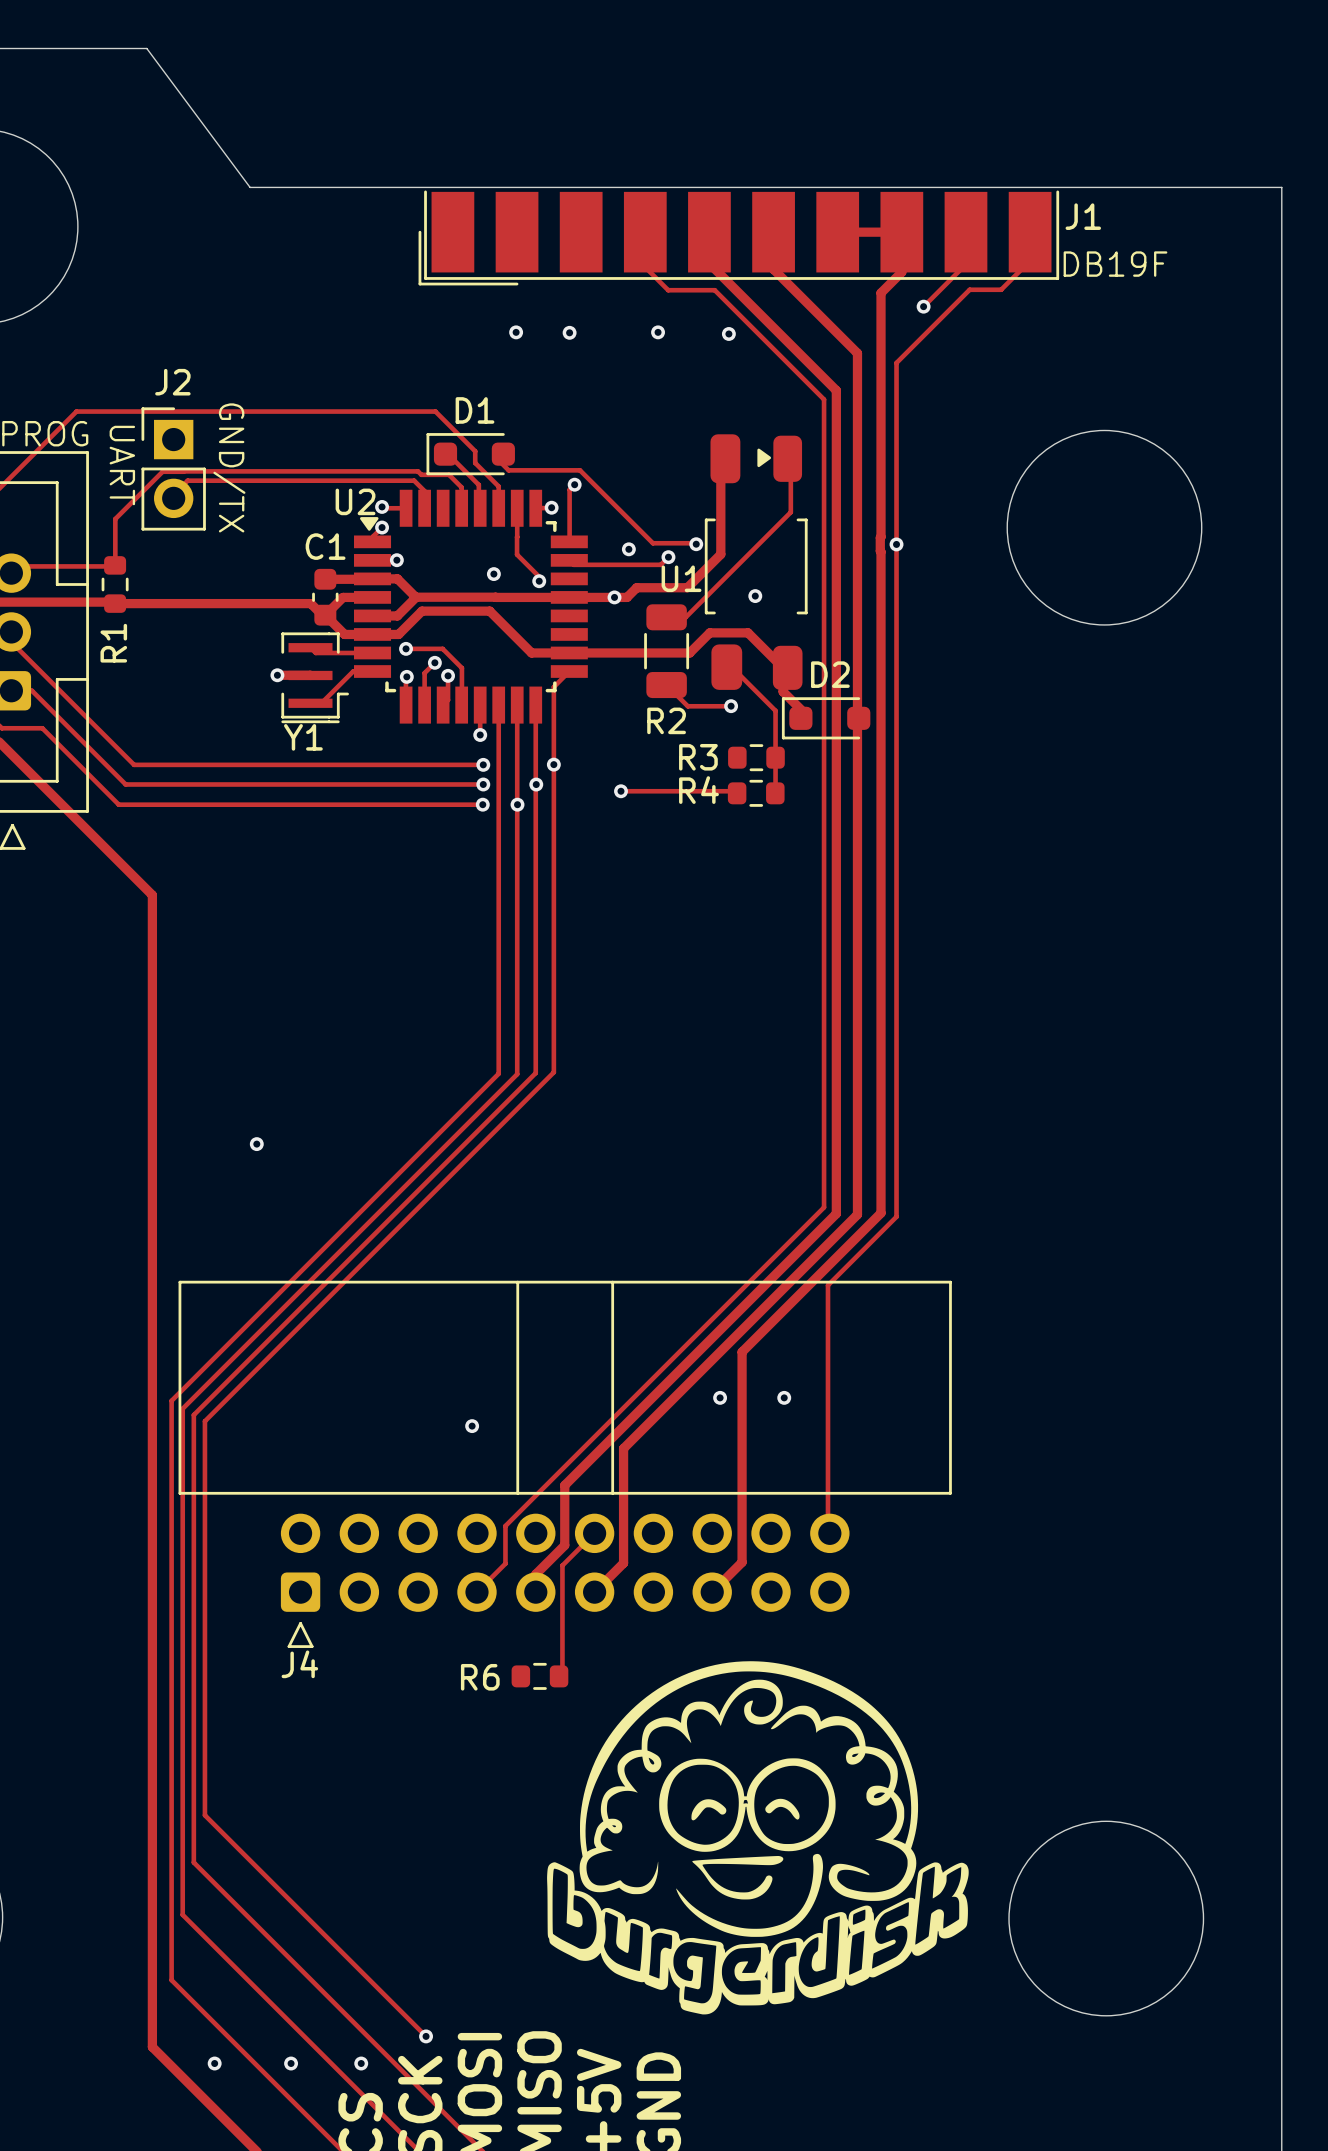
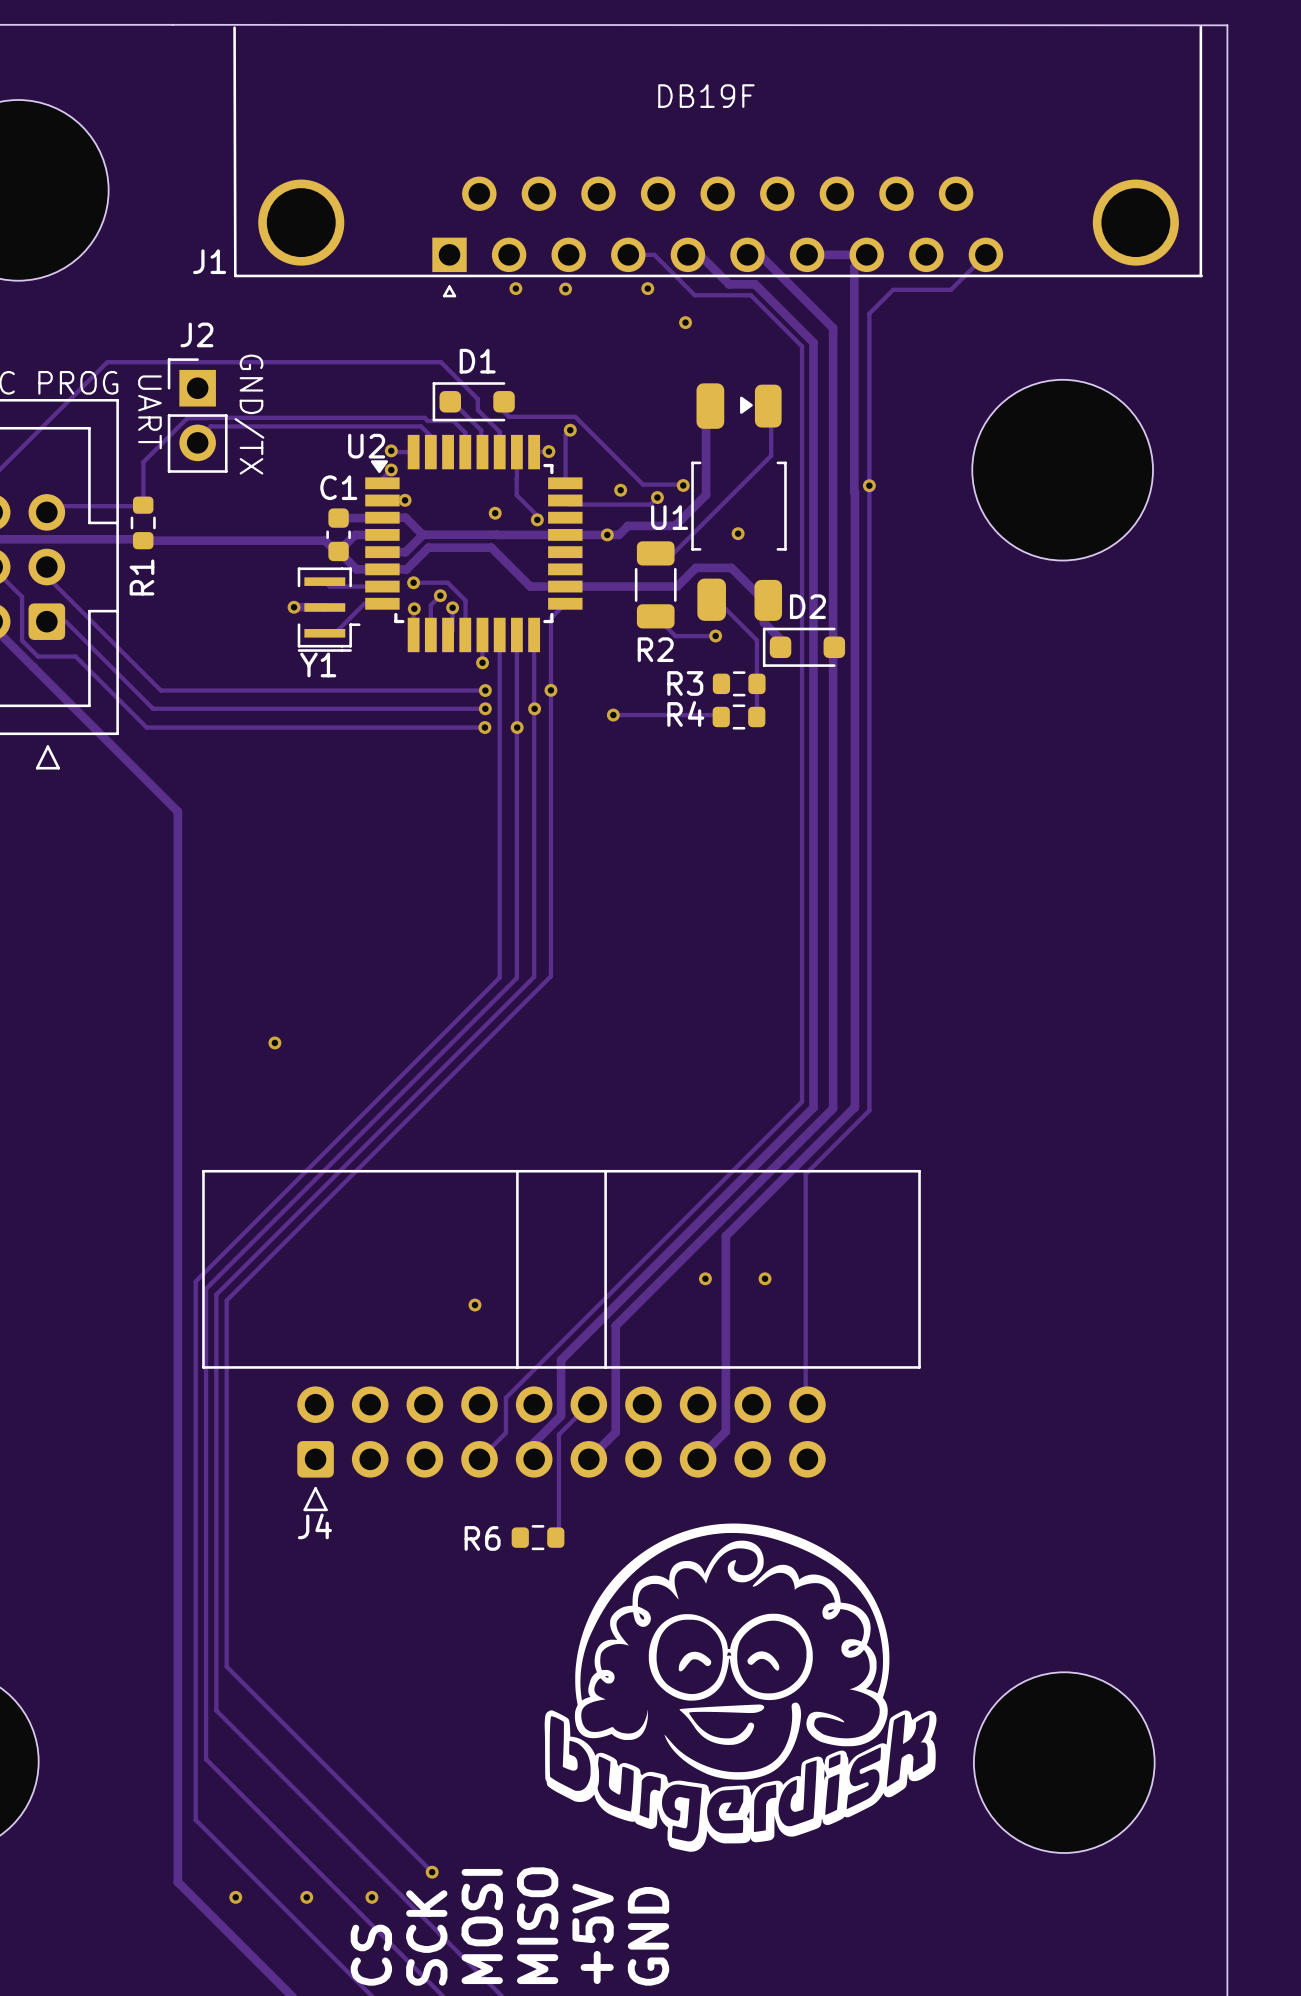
board edge: (146, 48) (250, 187) (1281, 187) -> (172, 24) (1227, 25) (1227, 153)
J1 footprint: [418, 190, 1060, 286] -> [233, 25, 1203, 298]
J1 name position: J1 (1083, 216) -> J1 (209, 261)
track: (645, 232) (645, 267) (668, 290) (714, 290) (824, 399) -> (628, 254) (654, 254) (694, 295) (750, 295) (802, 346) (802, 351)
track: (709, 232) (709, 263) (773, 327) -> (687, 254) (699, 254) (729, 284) (755, 284)
track: (773, 232) (773, 269) (857, 353) (857, 374) -> (747, 254) (759, 254) (833, 328)
track: (837, 232) (901, 232) (901, 272) (881, 293) (880, 537) -> (807, 254) (866, 254) (854, 267) (854, 479)
track: (965, 232) (965, 264) (923, 306) -> none
track: (1030, 232) (1030, 260) (1001, 289) (969, 289) (896, 362) -> (985, 254) (950, 289) (893, 289) (869, 313) (869, 317)
text position: DB19F (1115, 264) -> DB19F (706, 96)
via: (923, 306) -> none
via position: (728, 333) -> (685, 322)

